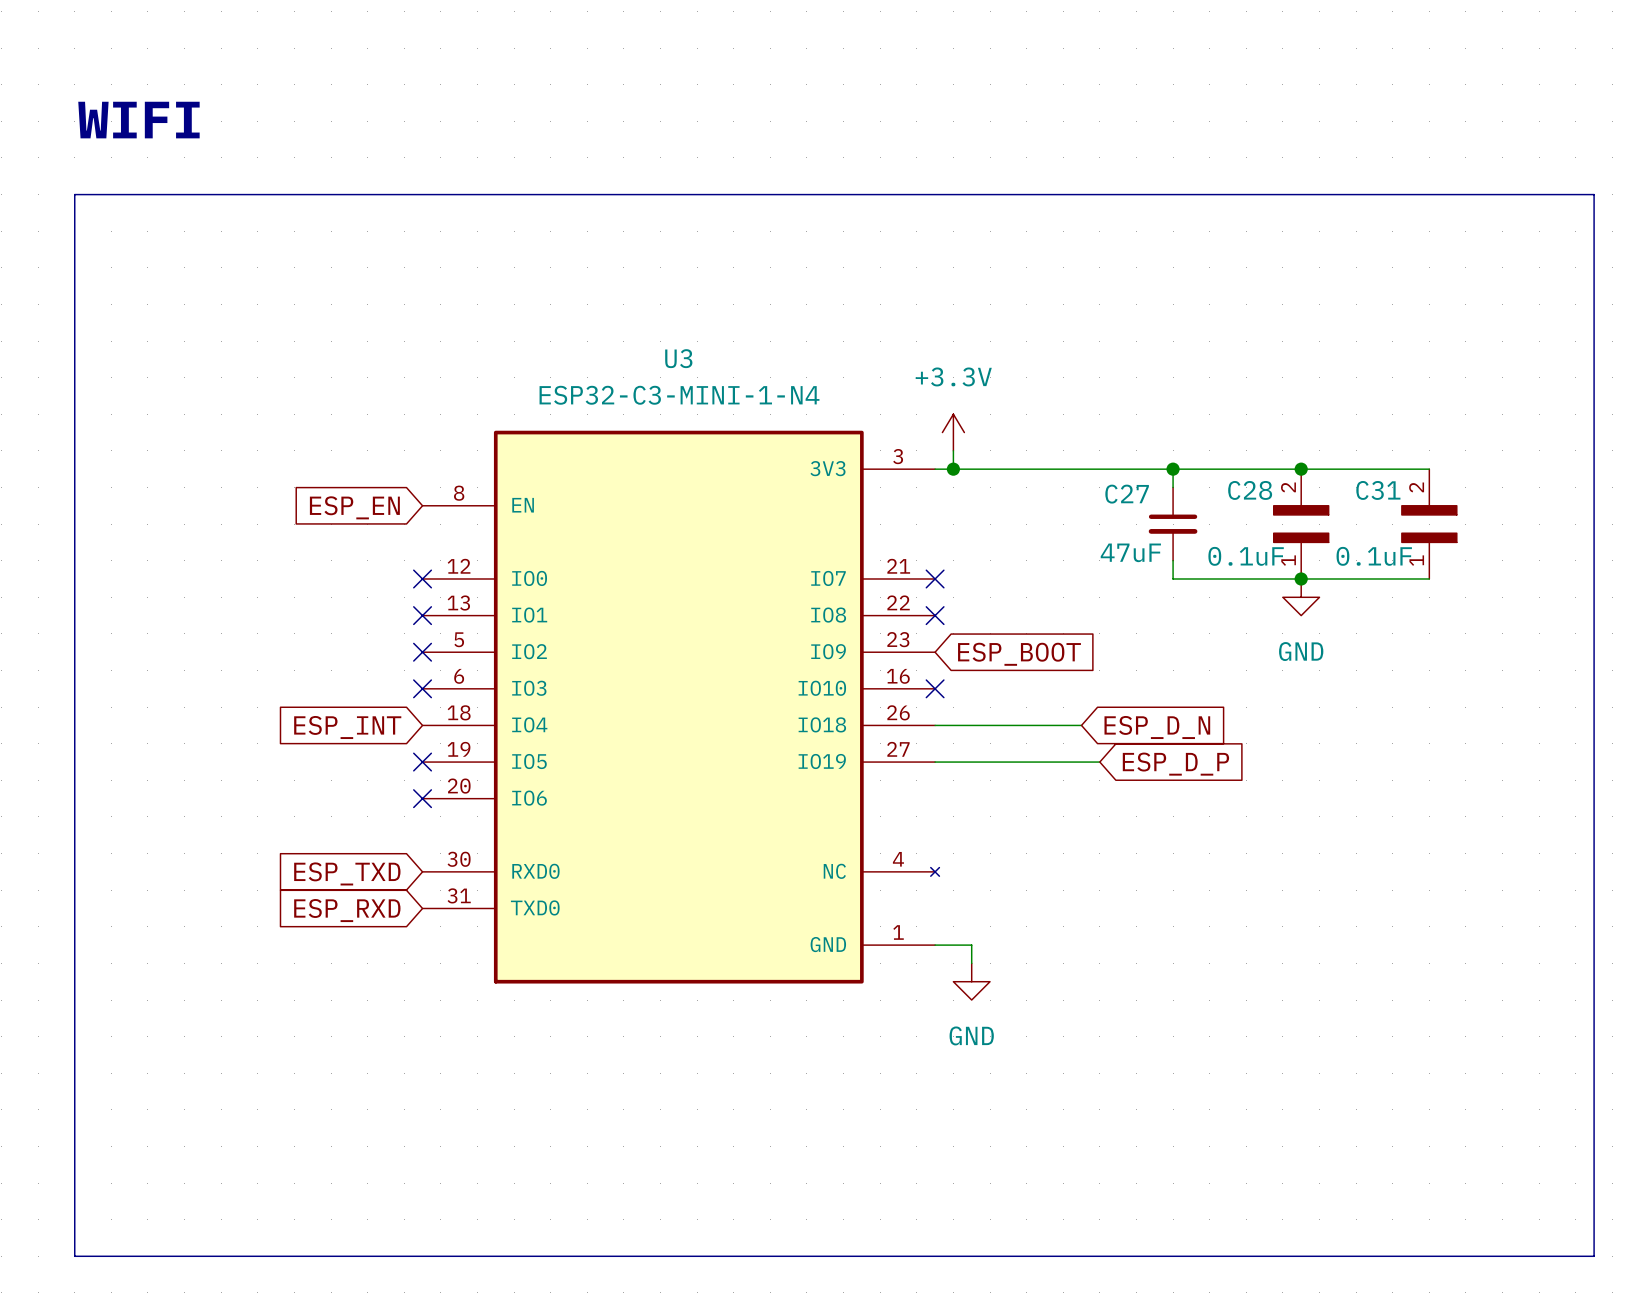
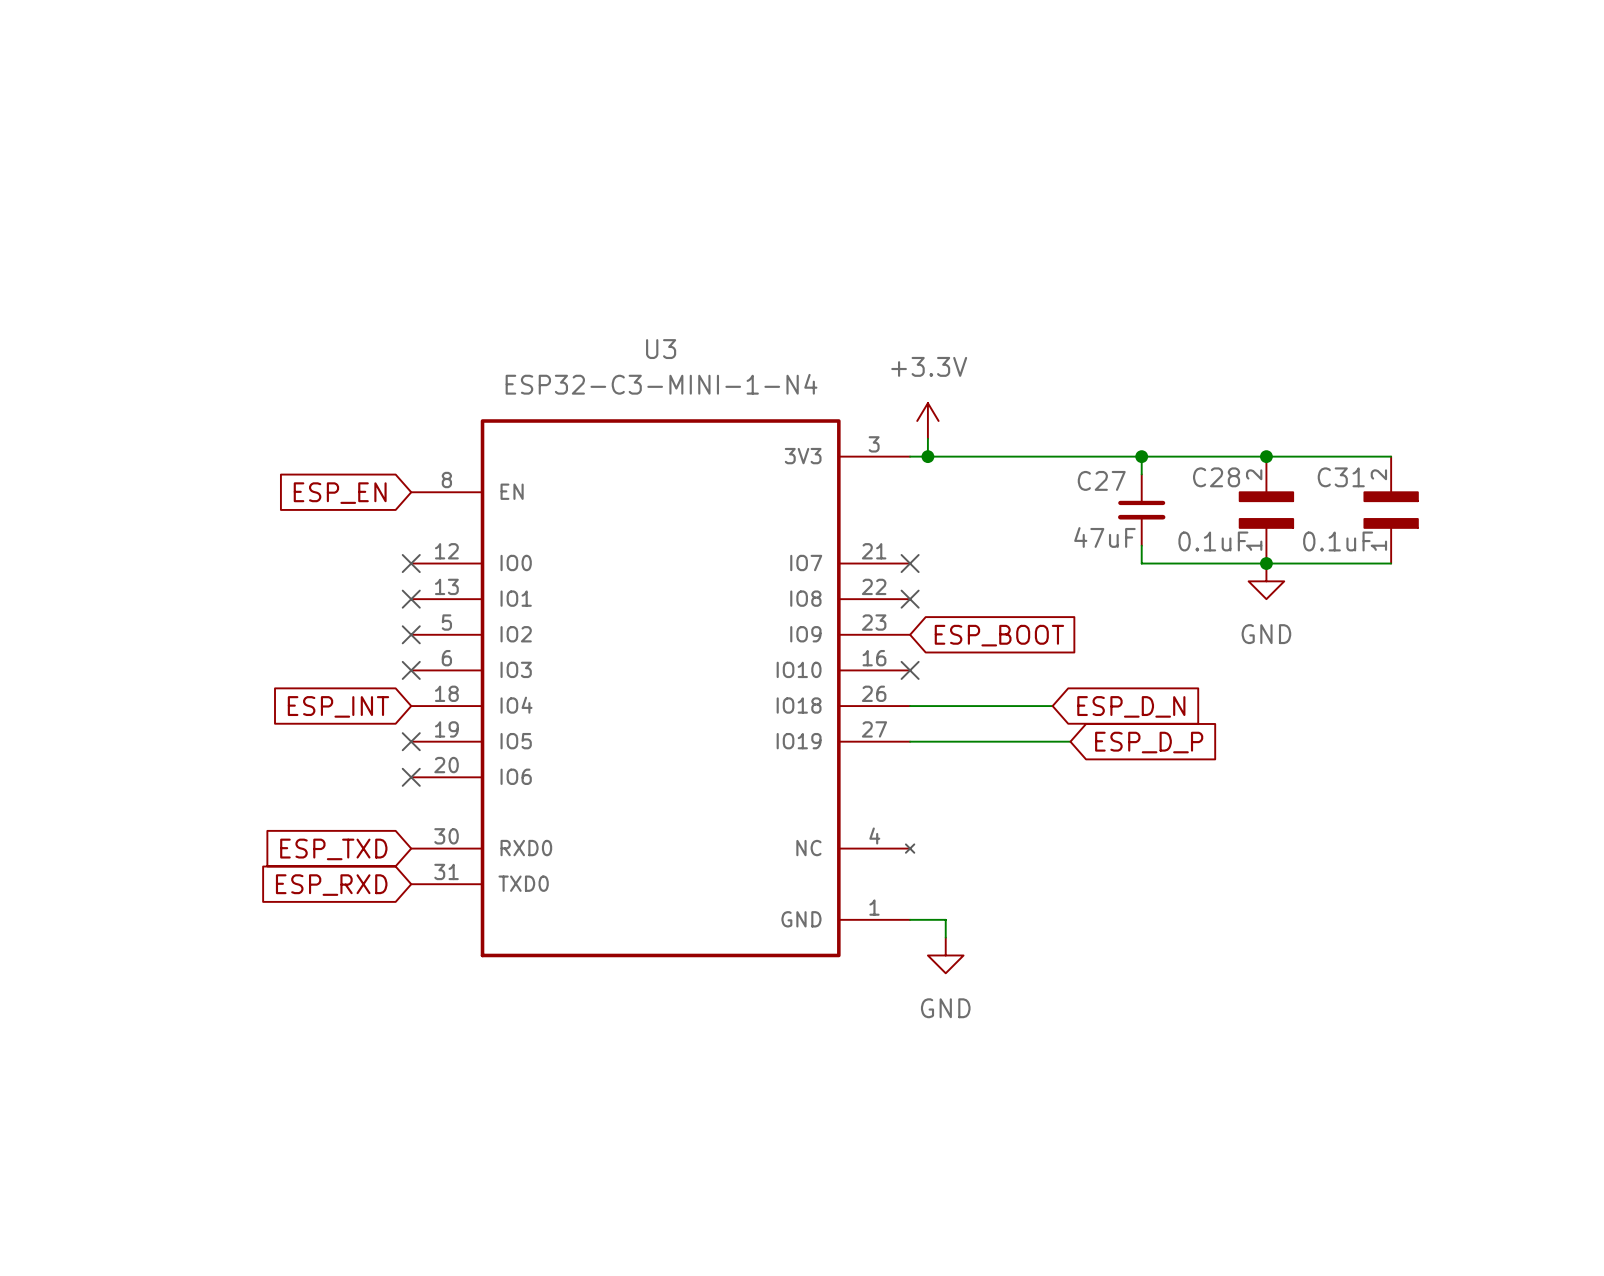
text: WIFI (138, 120) -> none
line: (74, 194) (1594, 194) (1594, 1256) (74, 1256) (74, 194) -> none

